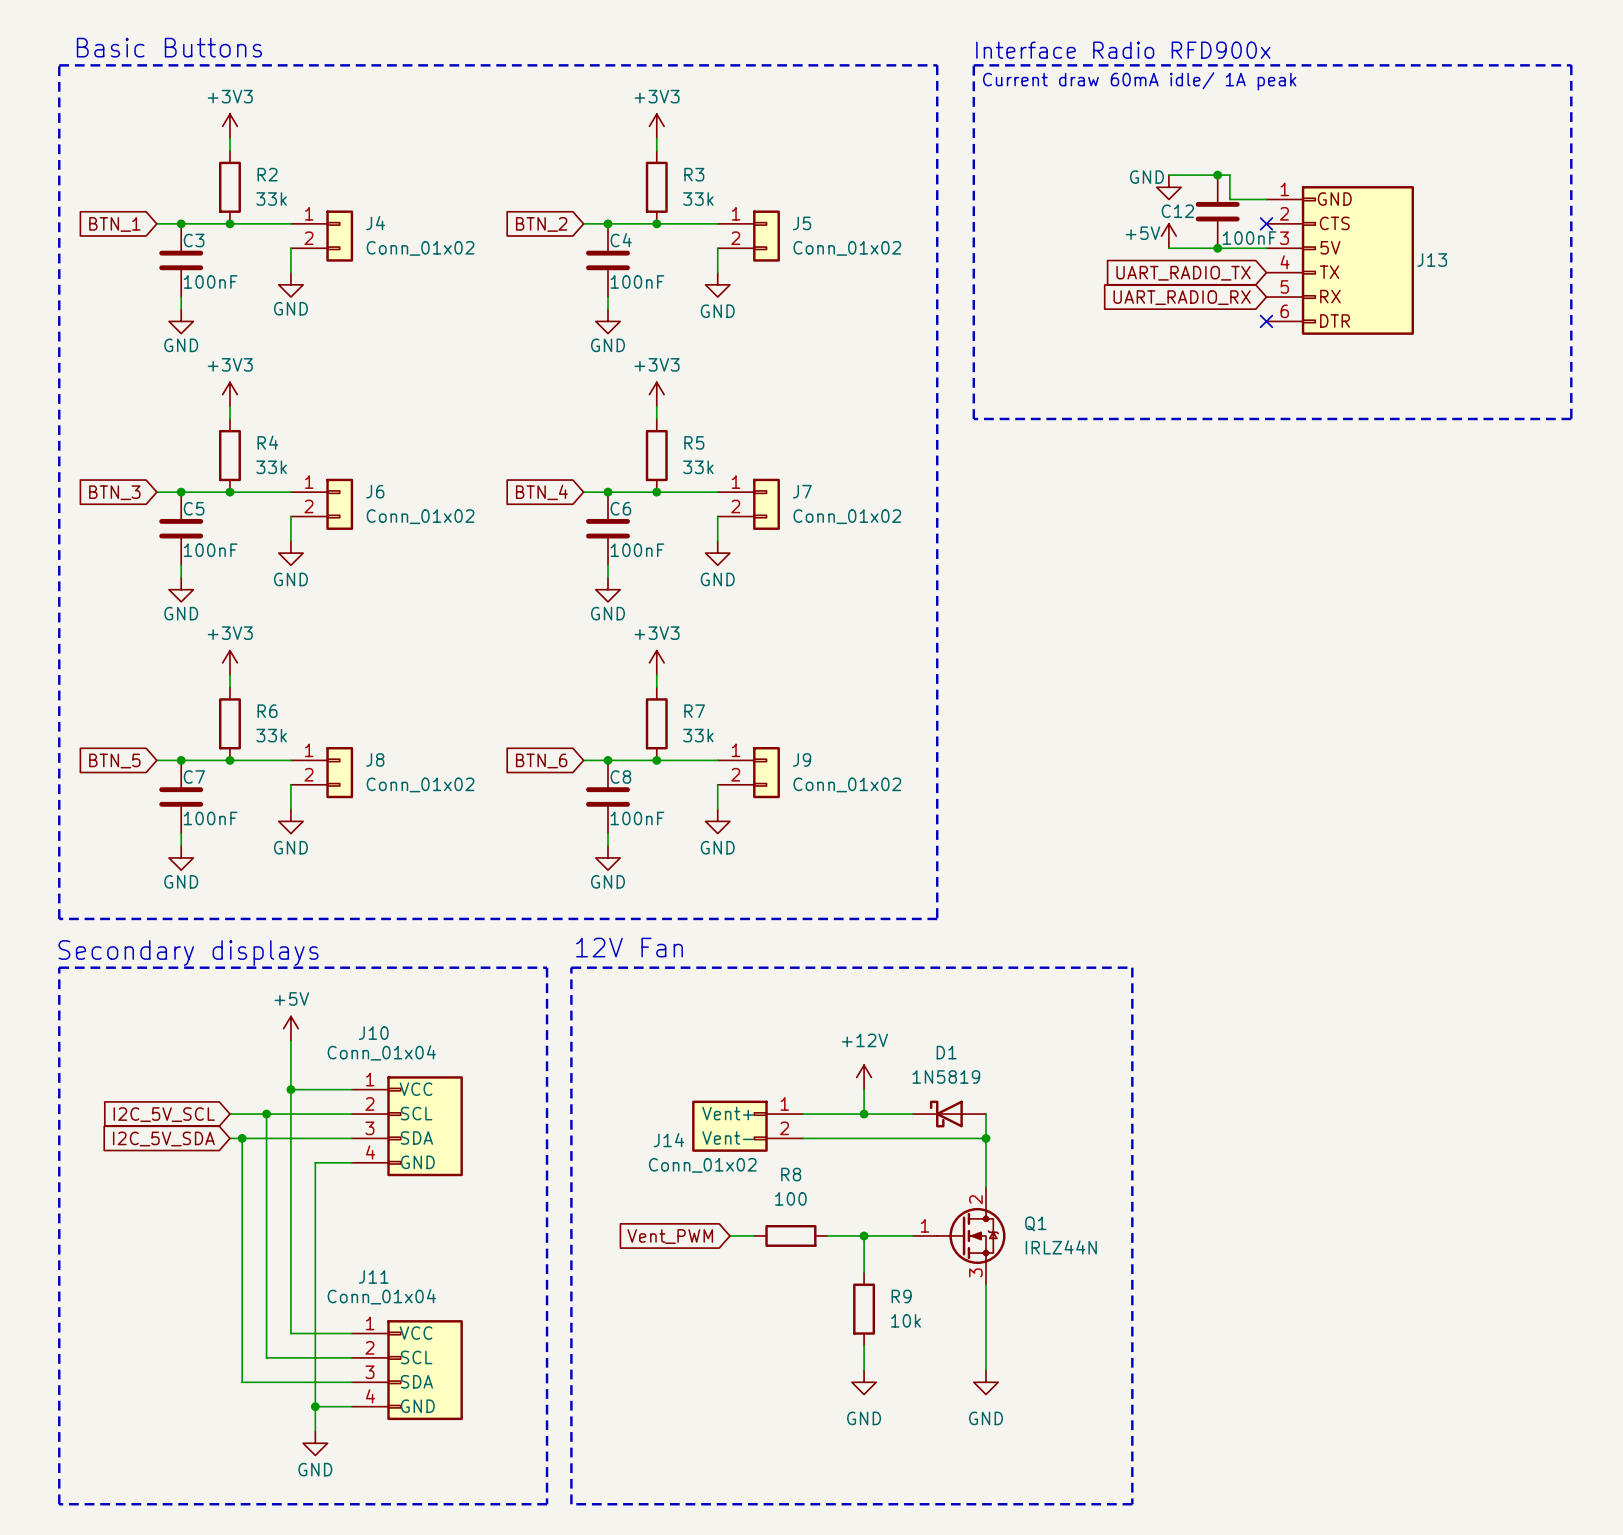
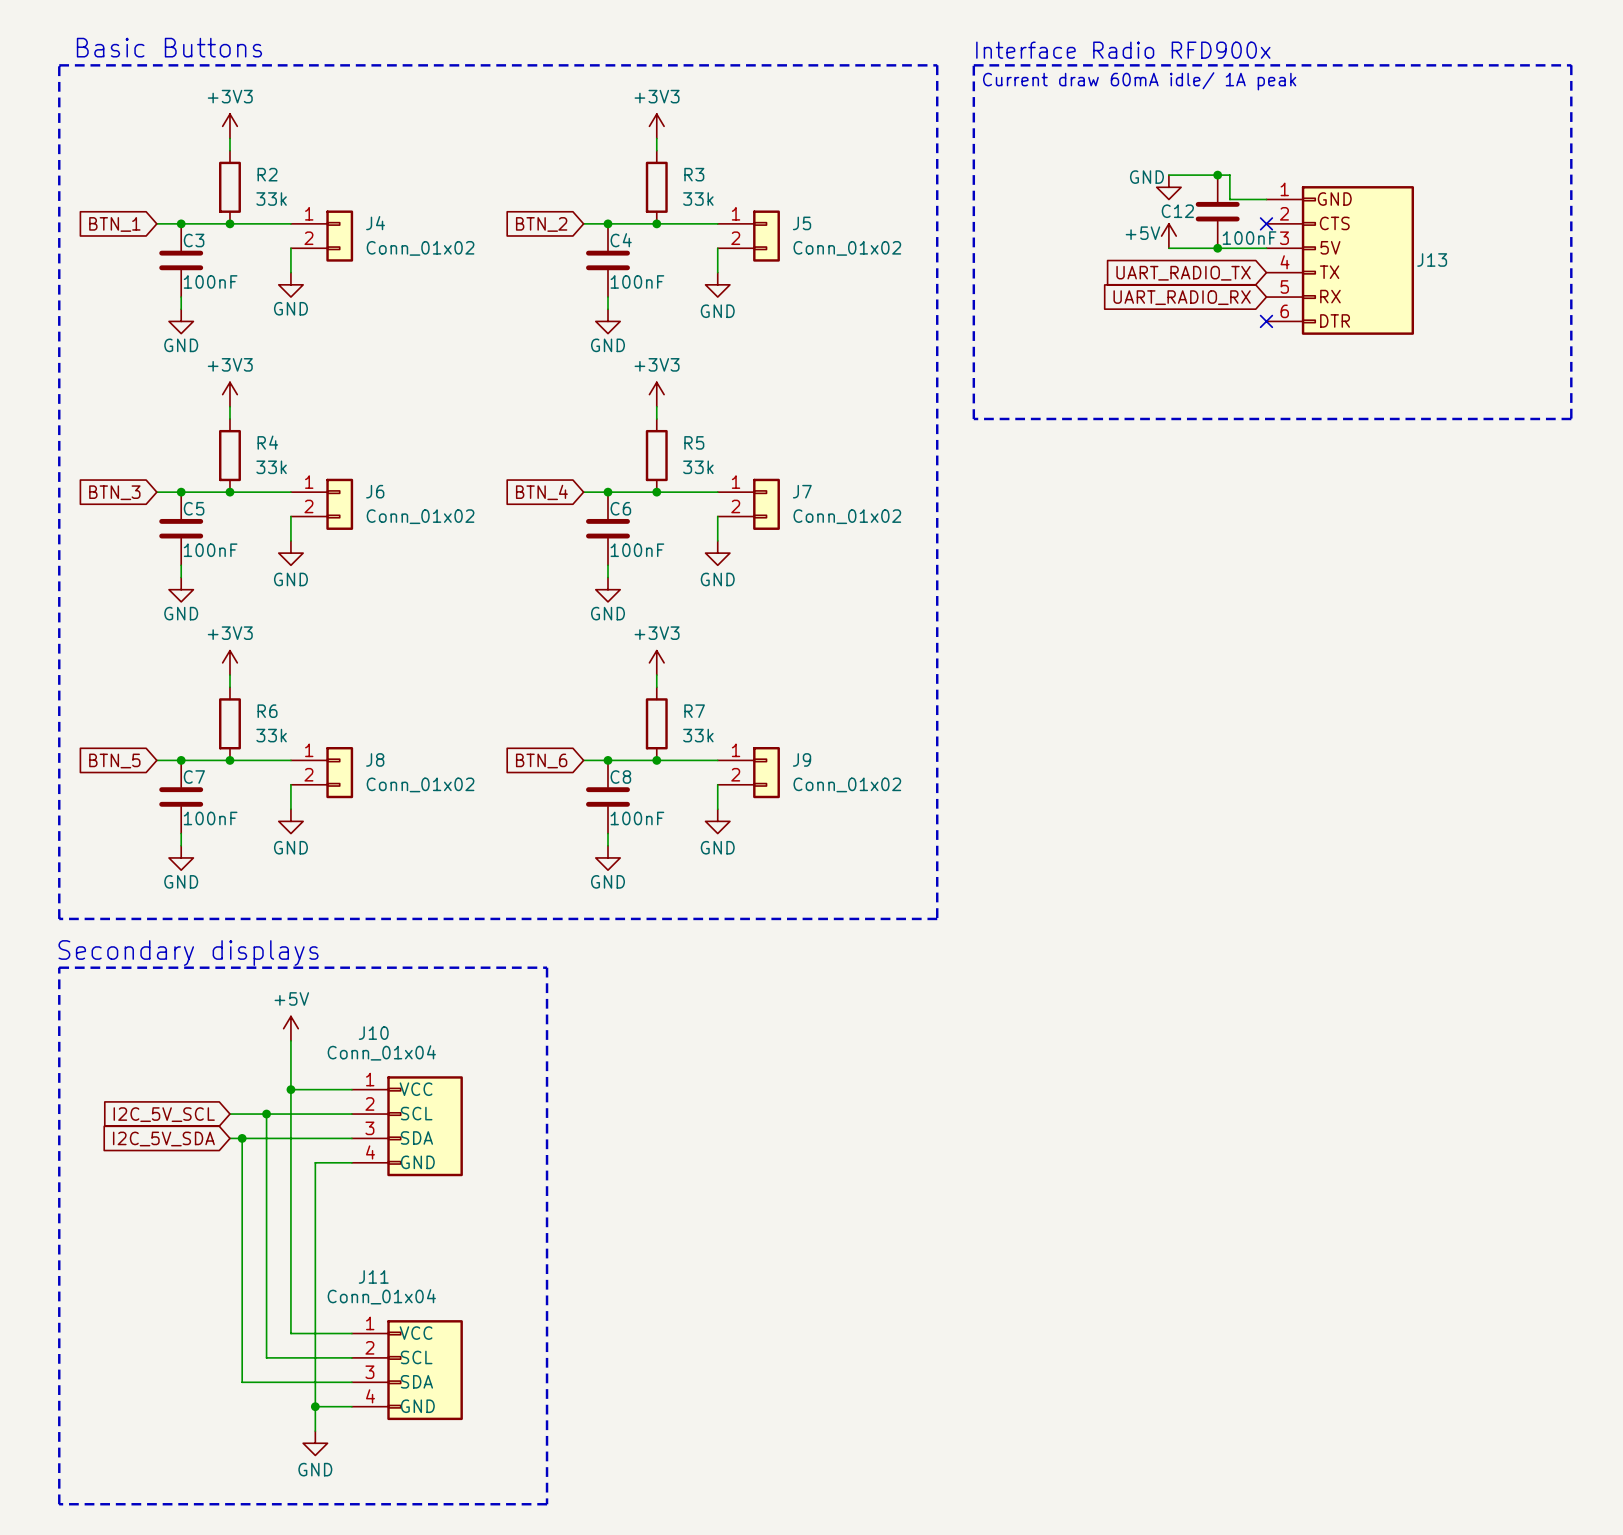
text: 12V Fan (629, 947) -> none
line: (571, 967) (1132, 967) (1132, 1504) (571, 1504) (571, 967) -> none
power symbol: +12V (864, 1077) -> none
wire: (864, 1089) (864, 1114) -> none
wire: (803, 1114) (912, 1114) -> none
junction: (864, 1114) -> none
D1: 1N5819 (949, 1114) -> none
wire: (986, 1114) (986, 1187) -> none
J14: Conn_01x02 (747, 1126) -> none
wire: (803, 1138) (986, 1138) -> none
junction: (986, 1138) -> none
wire: (729, 1235) (754, 1235) -> none
R8: 100 (790, 1235) -> none
wire: (827, 1235) (912, 1235) -> none
wire: (864, 1235) (864, 1272) -> none
junction: (864, 1235) -> none
Q1: IRLZ44N (959, 1235) -> none
global label: Vent_PWM (670, 1236) -> none
wire: (986, 1284) (986, 1370) -> none
R9: 10k (864, 1309) -> none
wire: (864, 1345) (864, 1370) -> none
power symbol: GND (864, 1382) -> none
power symbol: GND (986, 1382) -> none

